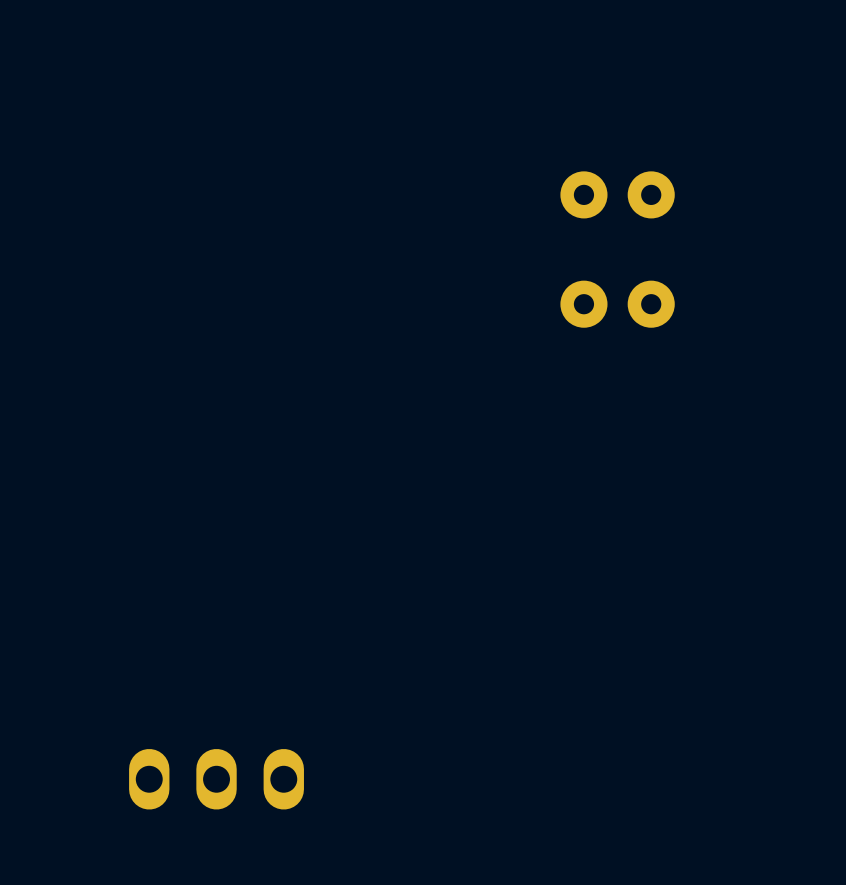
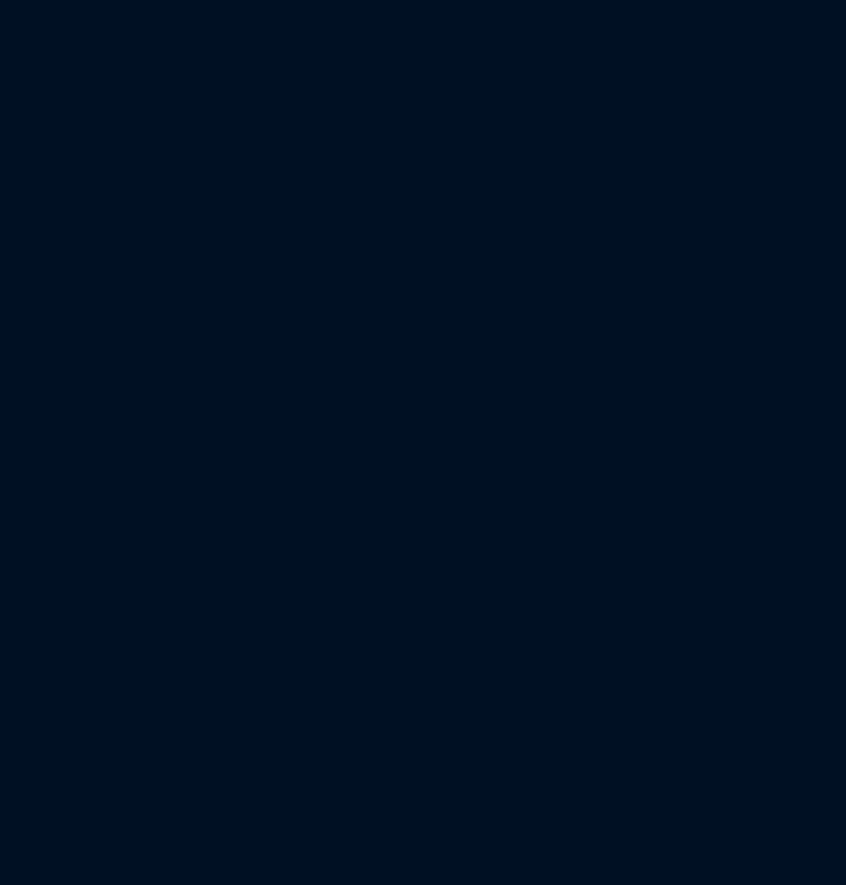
part: (617, 194) -> none
part: (617, 304) -> none
part: (216, 779) -> none

